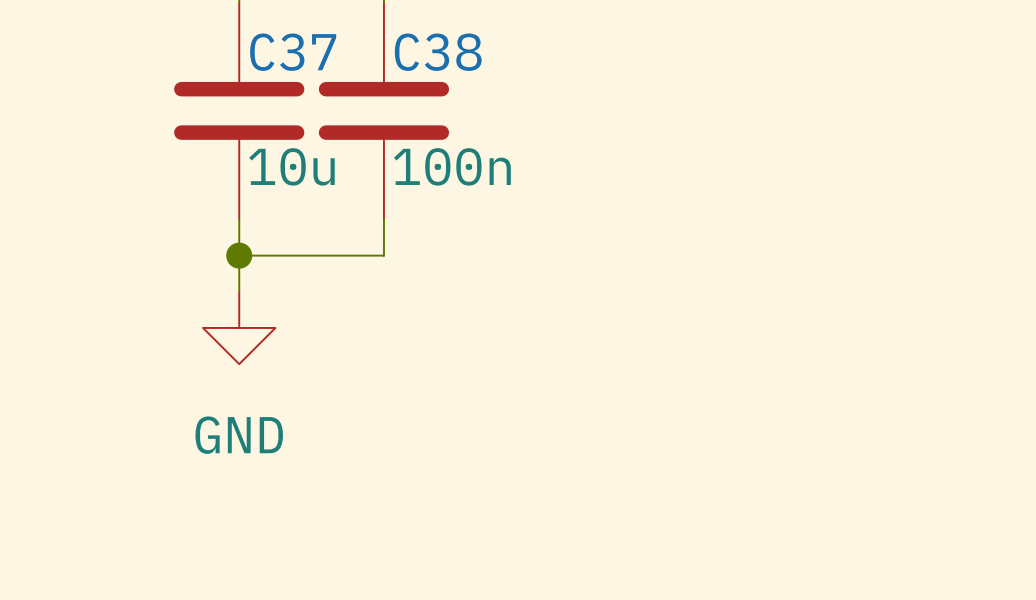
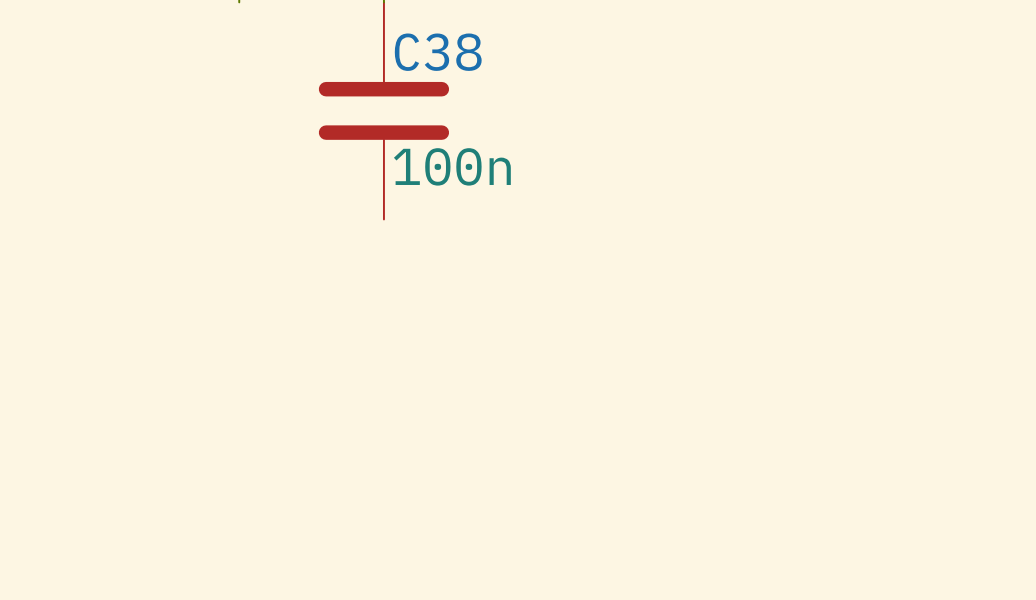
C37: 10u (239, 110) -> none
wire: (239, 219) (239, 291) -> none
wire: (383, 219) (383, 255) (239, 255) -> none
junction: (239, 255) -> none
power symbol: GND (239, 327) -> none

